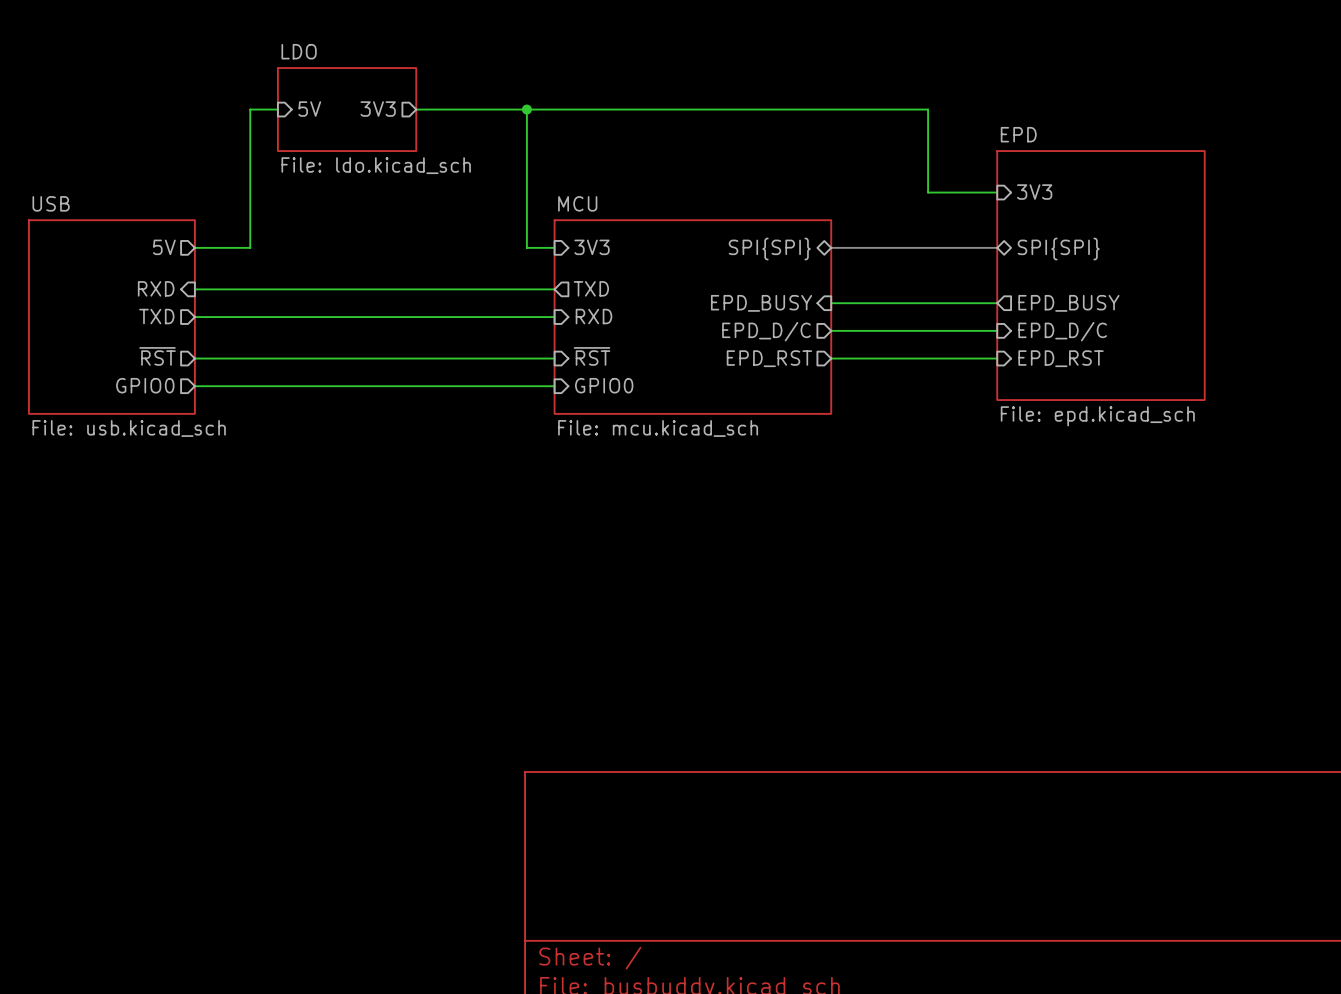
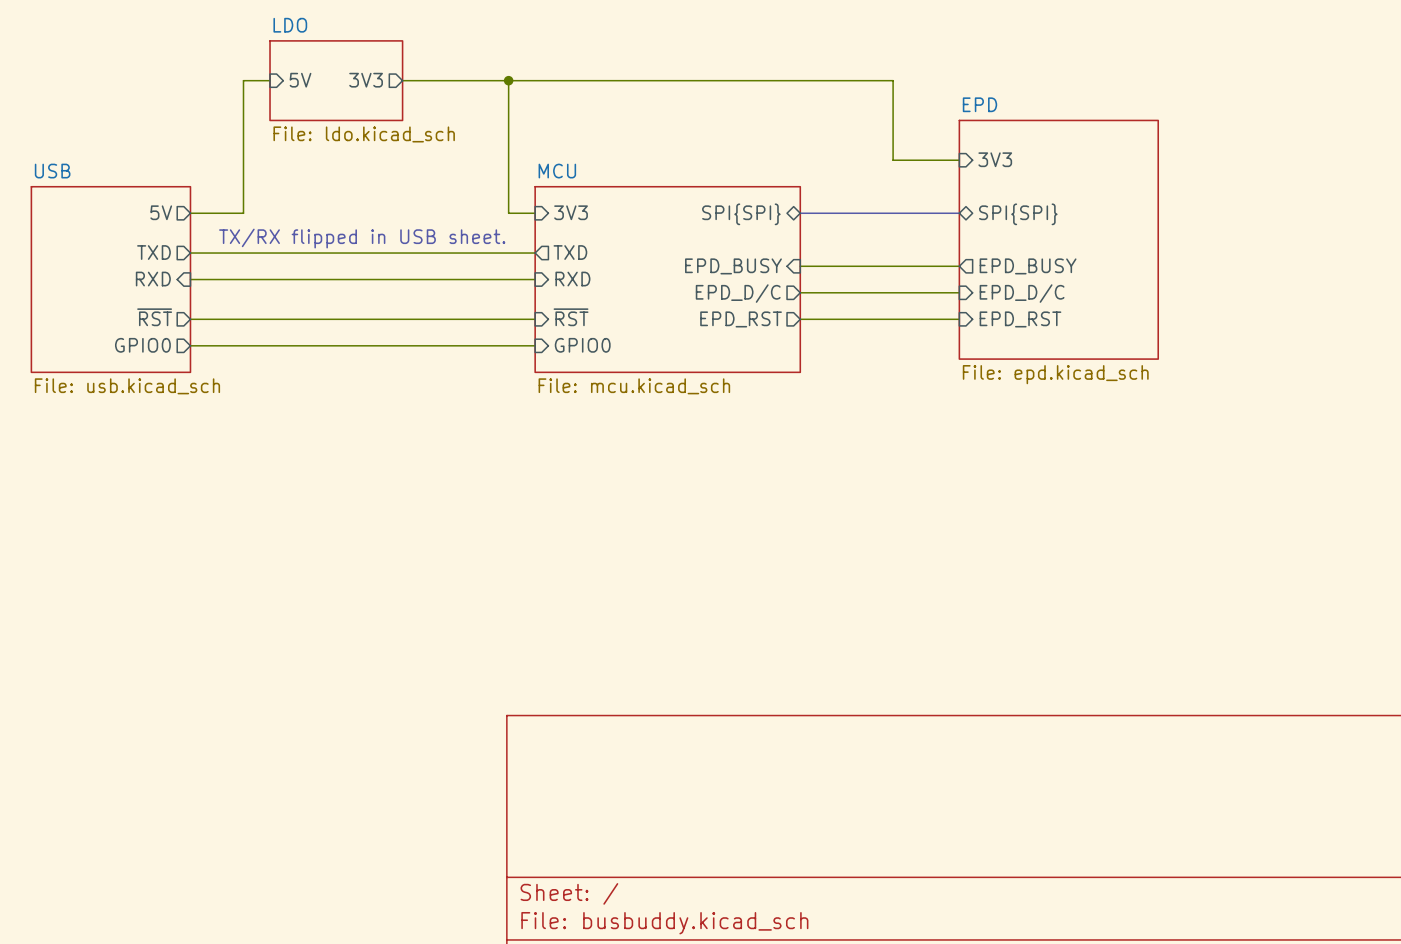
text: none -> TX/RX flipped in USB sheet. (362, 238)
sheet pin shape: input (156, 288) -> output (153, 252)
sheet pin: RXD (156, 288) -> TXD (153, 252)
sheet pin shape: output (156, 316) -> input (153, 279)
sheet pin: TXD (156, 316) -> RXD (153, 279)

